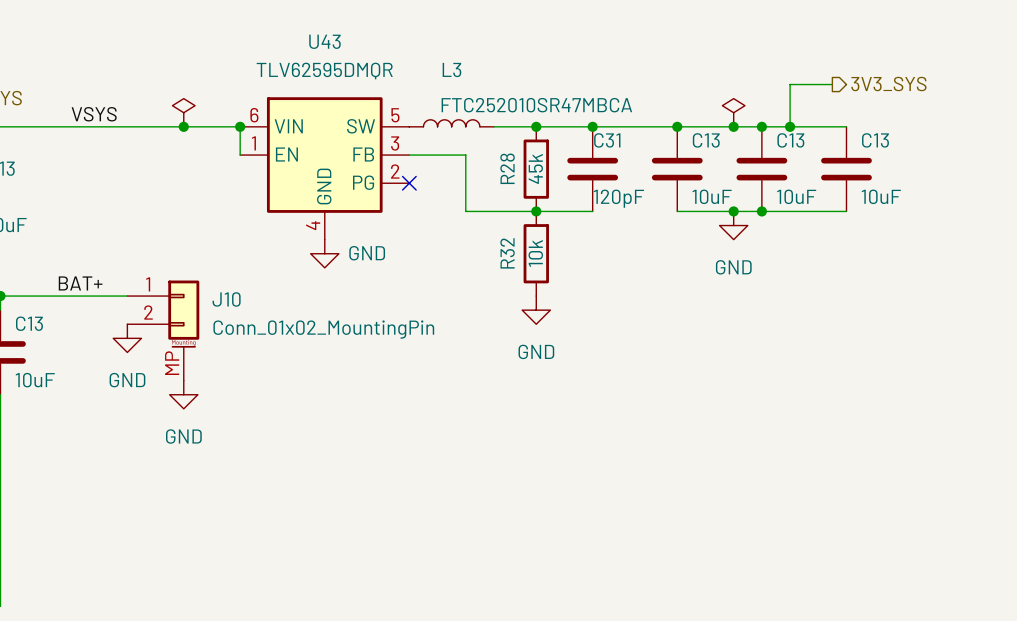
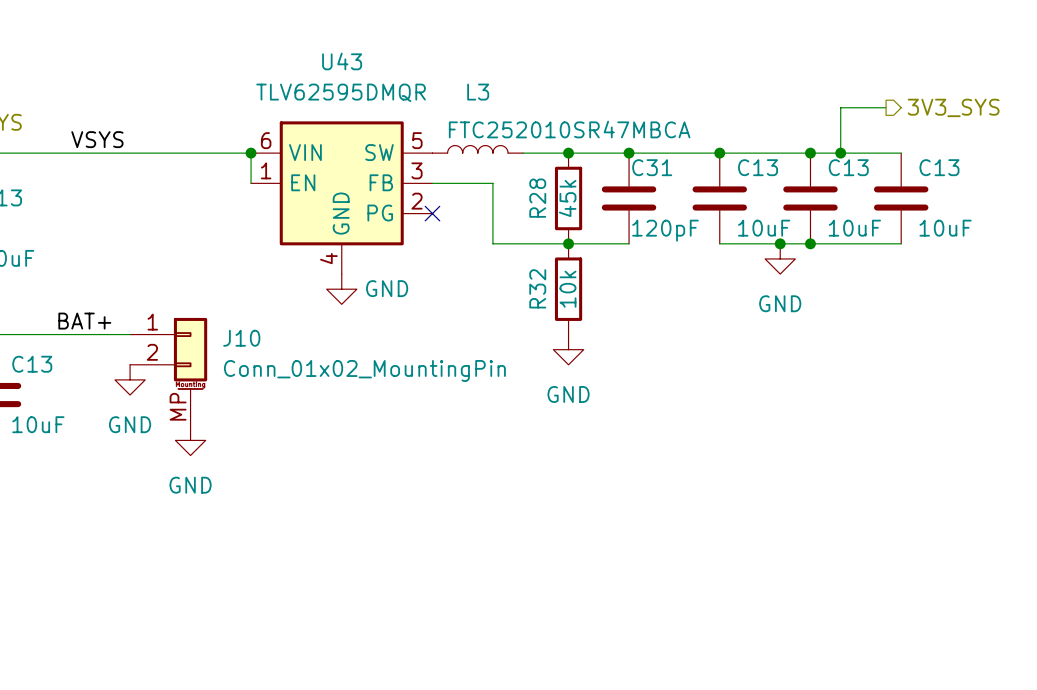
power symbol: (183, 112) -> none
power symbol: (733, 112) -> none
junction: (183, 126) -> none
junction: (733, 126) -> none

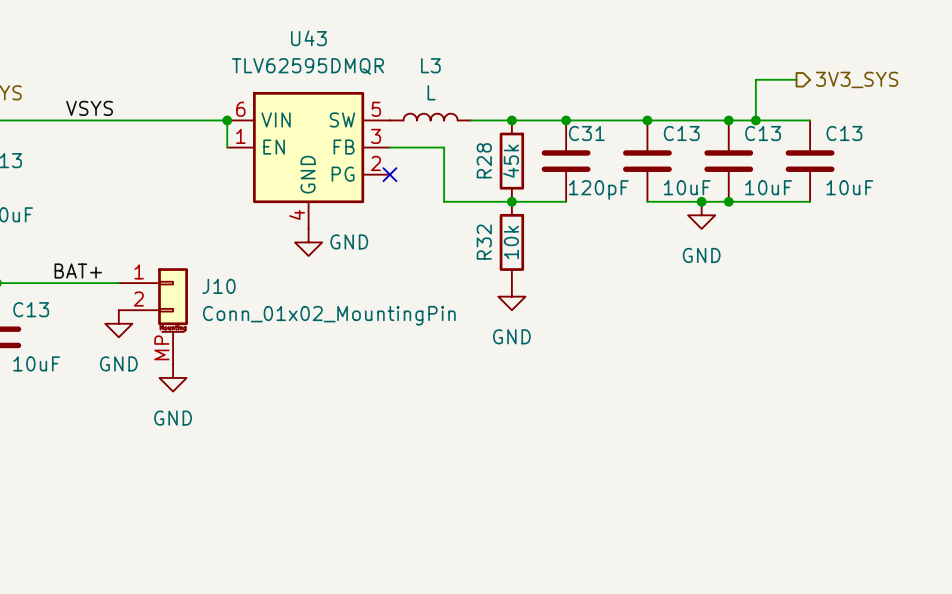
L3 value: FTC252010SR47MBCA (569, 129) -> L (431, 92)

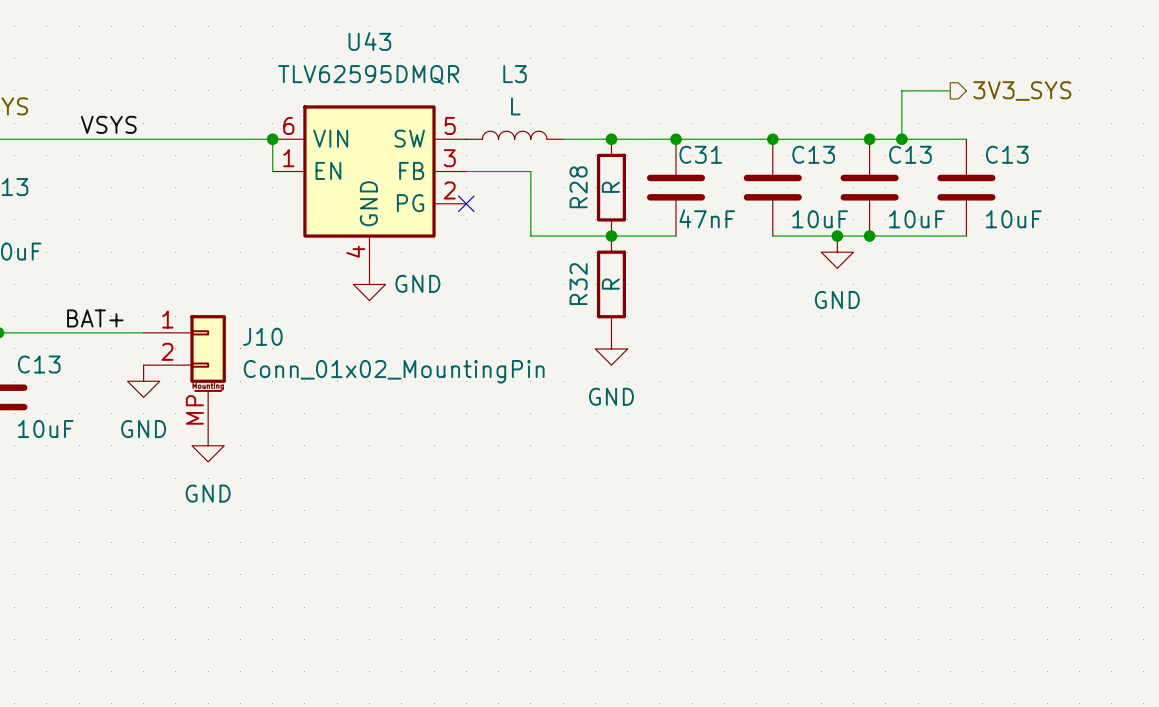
R28 value: 45k (511, 161) -> R (610, 187)
C31 value: 120pF (598, 189) -> 47nF (707, 218)
R32 value: 10k (511, 242) -> R (610, 284)

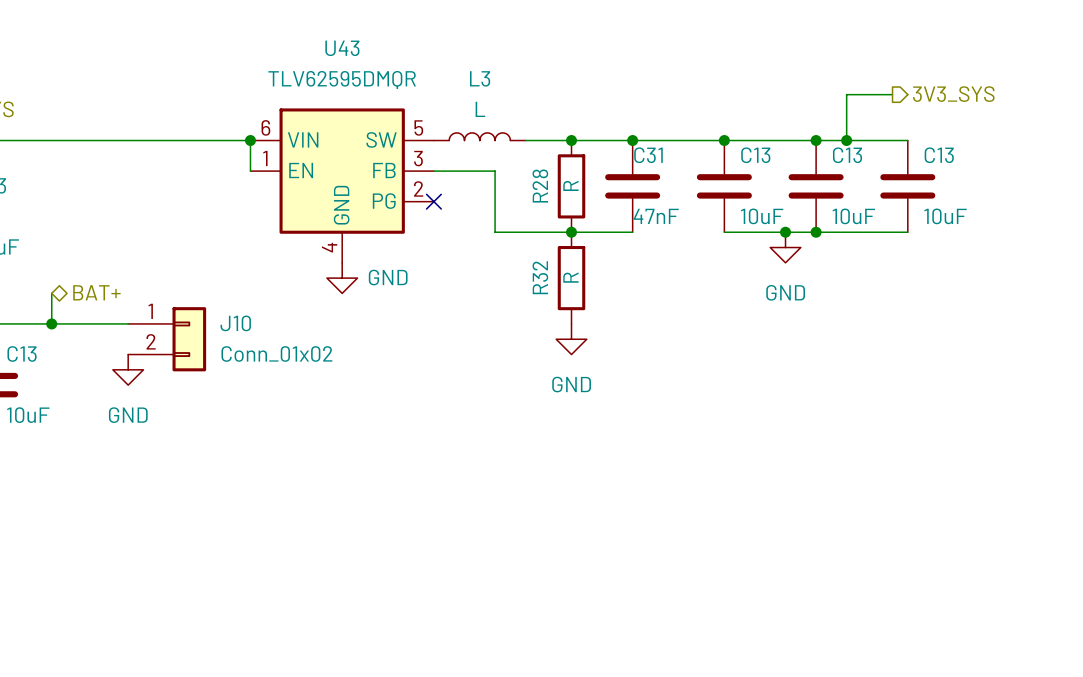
label: VSYS (108, 124) -> none
hierarchical label: none -> BAT+ (96, 292)
wire: none -> (51, 293) (51, 323)
J10 symbol: [143, 315, 226, 430] -> [128, 307, 207, 372]
label: BAT+ (95, 318) -> none
junction: none -> (51, 323)
J10 value: Conn_01x02_MountingPin (394, 371) -> Conn_01x02 (276, 353)
power symbol: GND (208, 445) -> none

